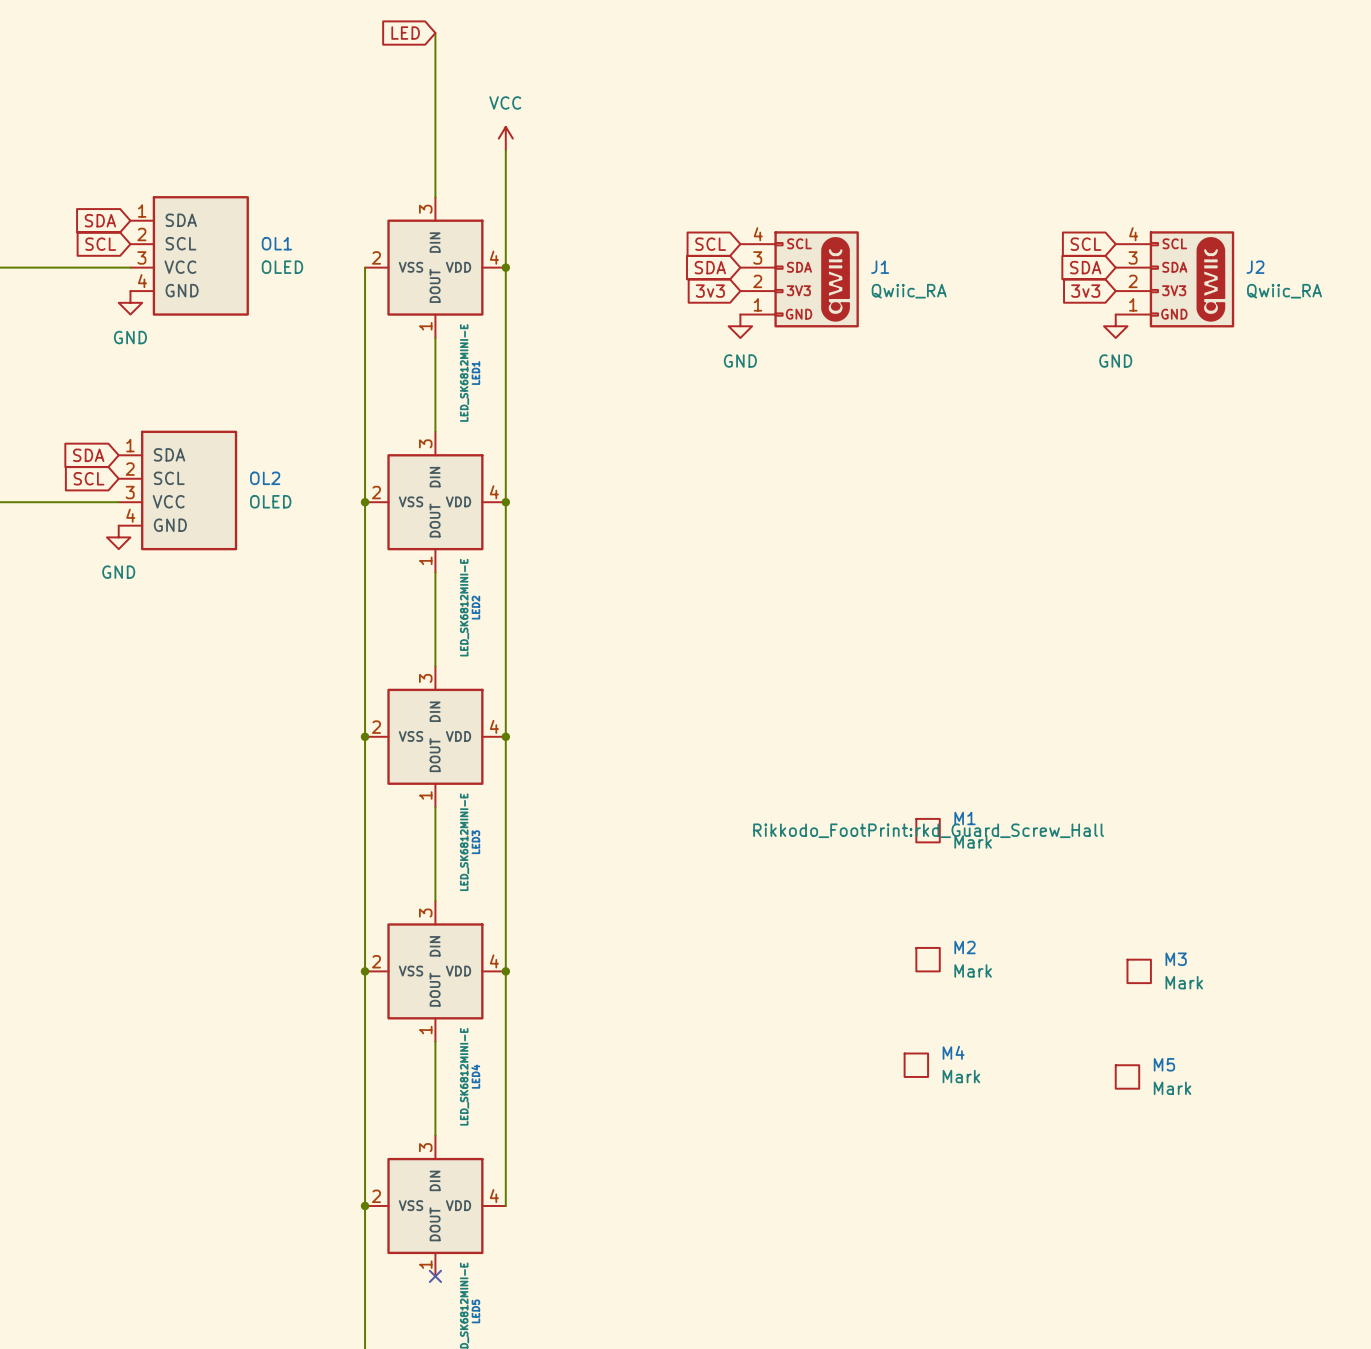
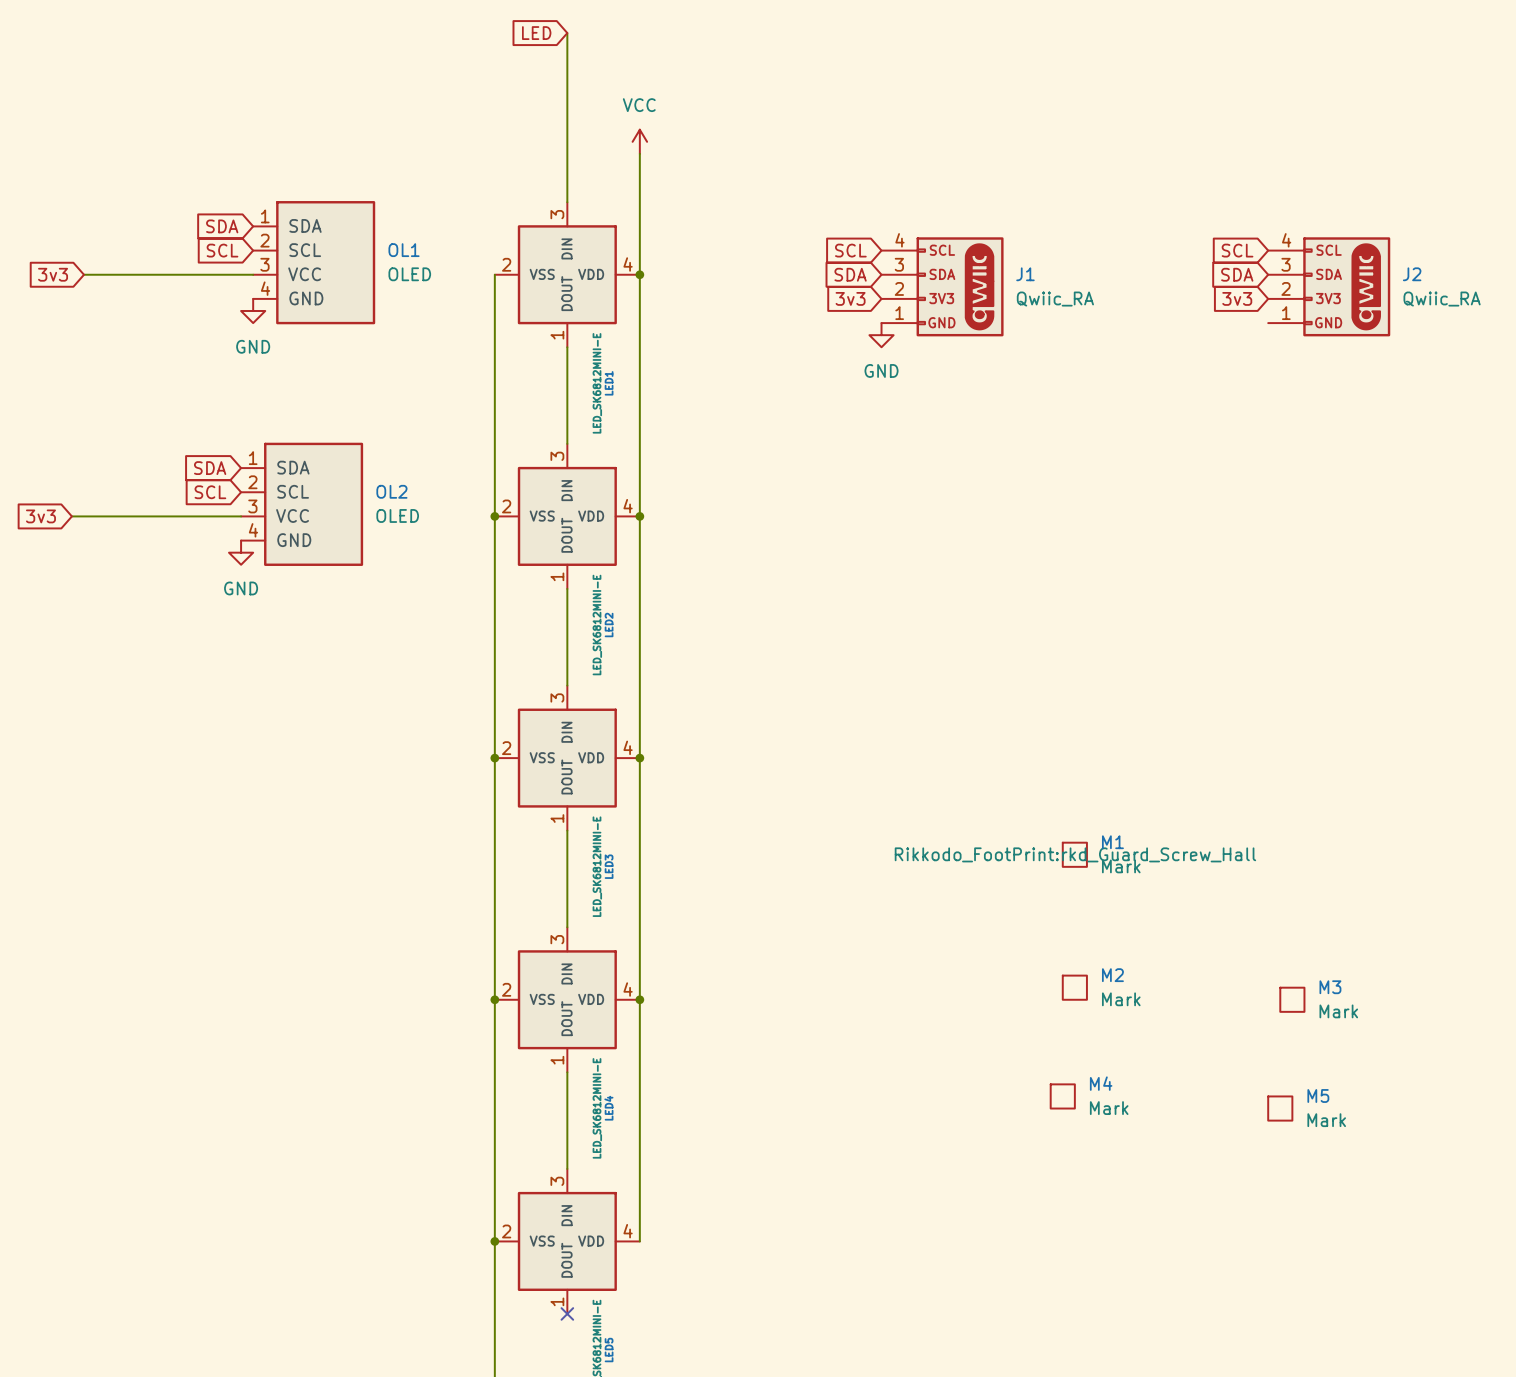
power symbol: GND (1115, 326) -> none

